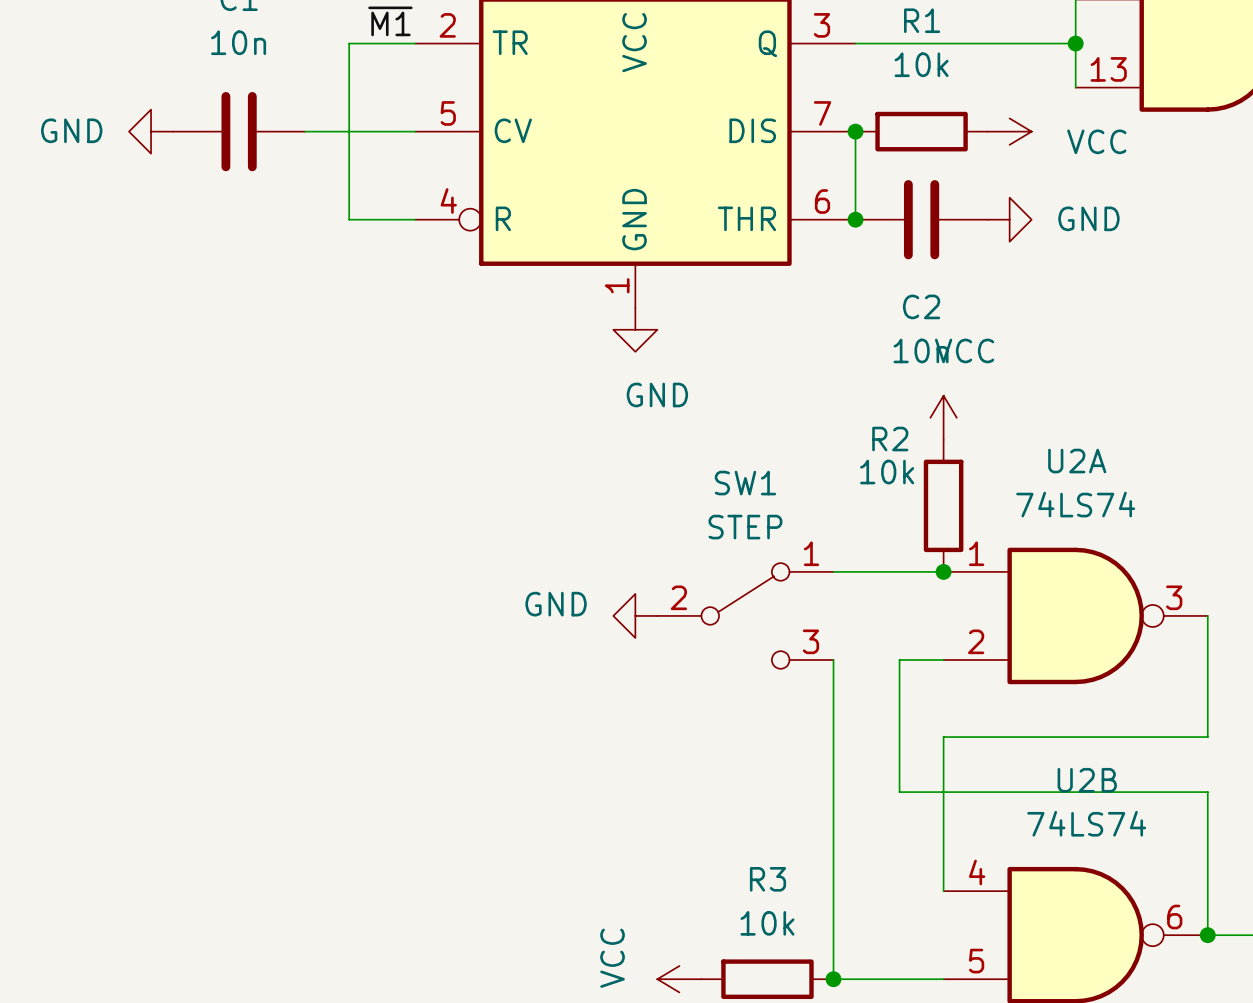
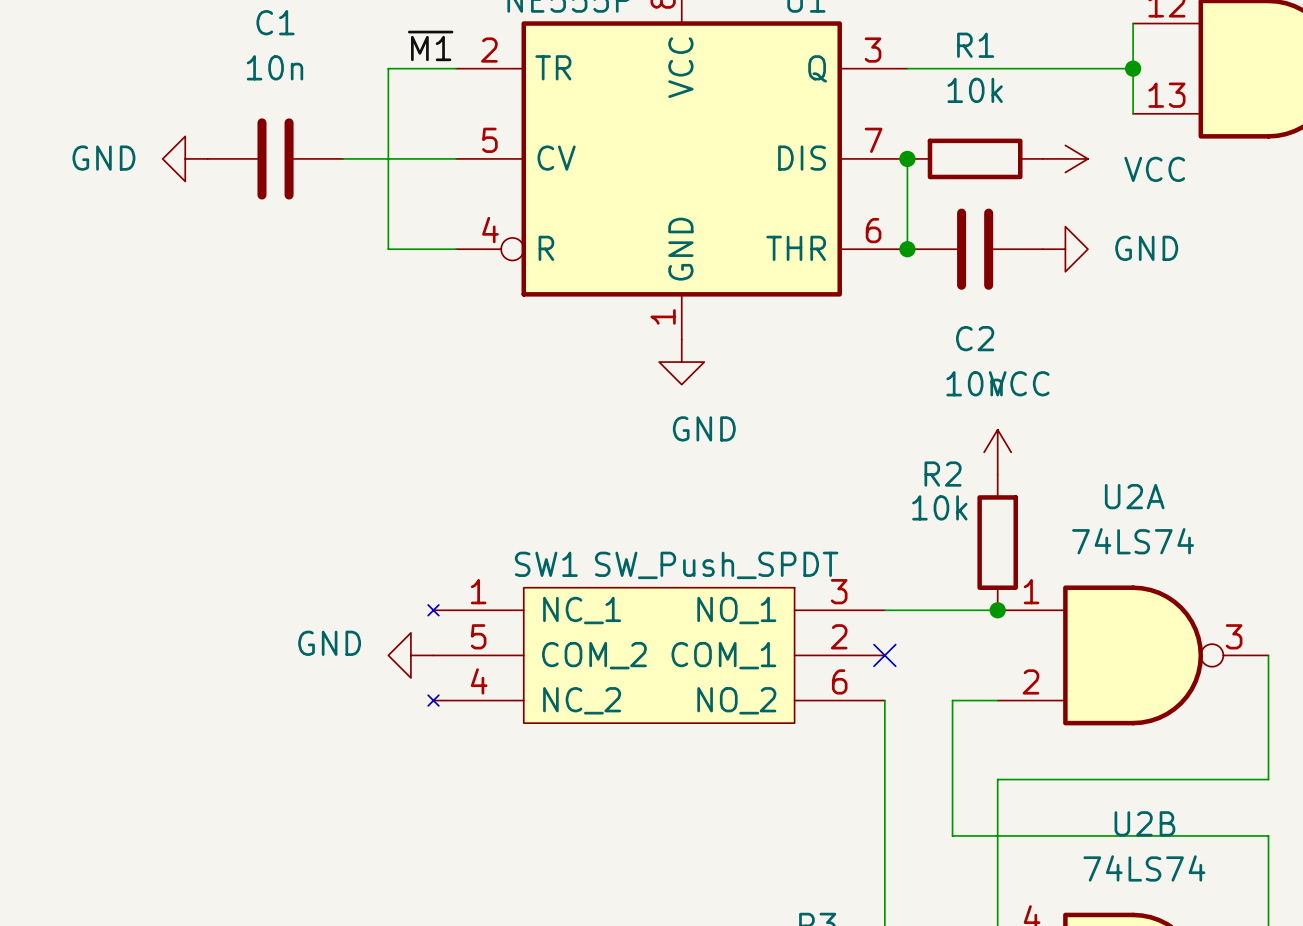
SW1 name position: SW1 (745, 483) -> SW1 (546, 564)
SW1 value: STEP (745, 527) -> SW_Push_SPDT (716, 565)
SW1 symbol: [657, 563, 834, 669] -> [428, 587, 885, 724]
power symbol position: GND (635, 615) -> GND (410, 655)
no-connect mark: none -> (884, 655)

